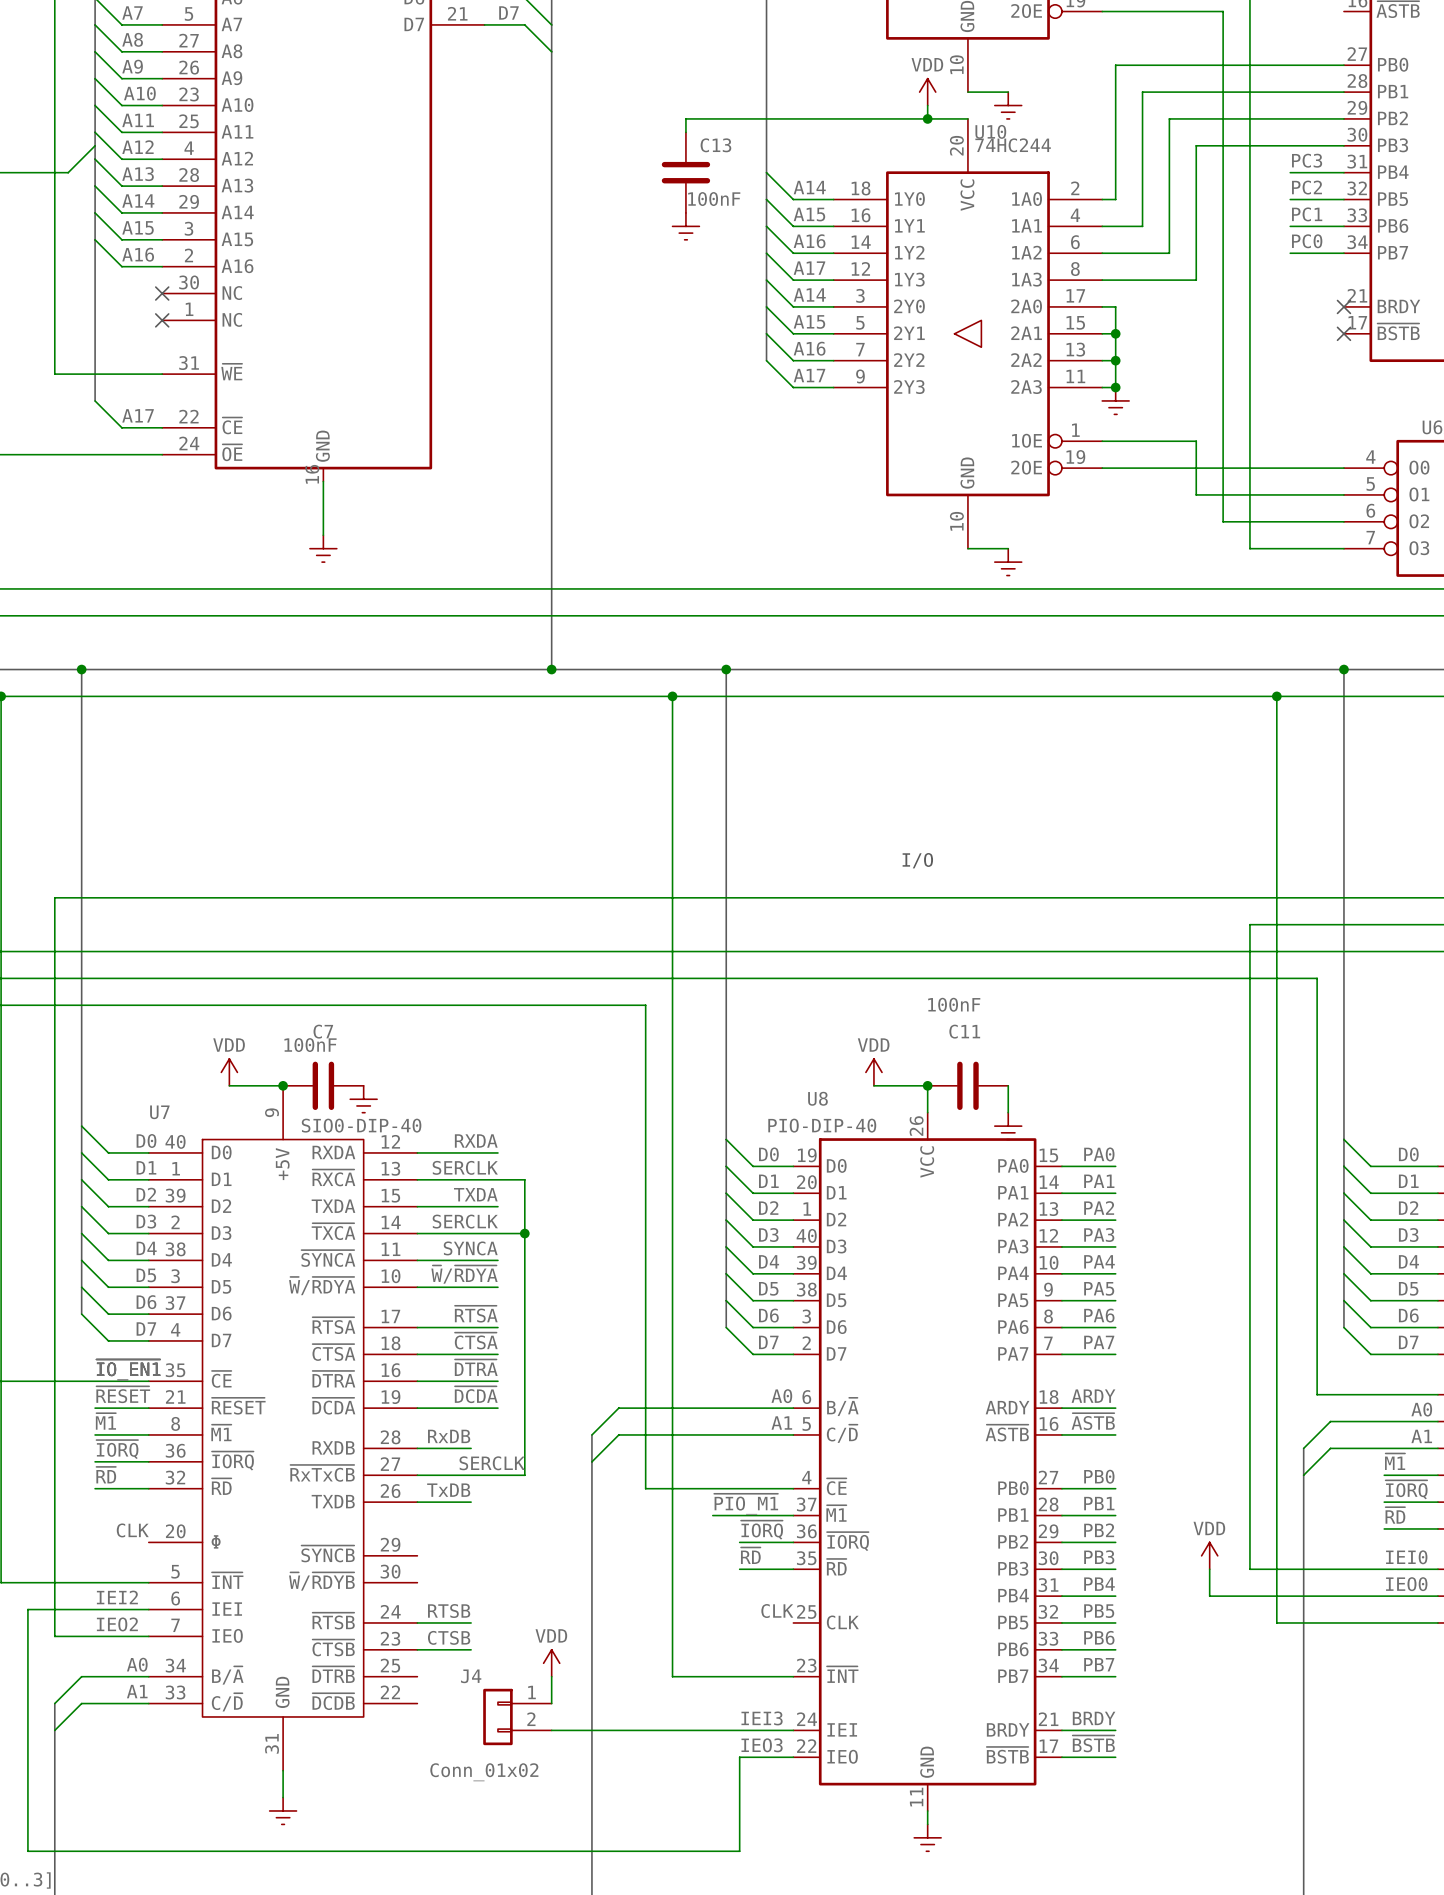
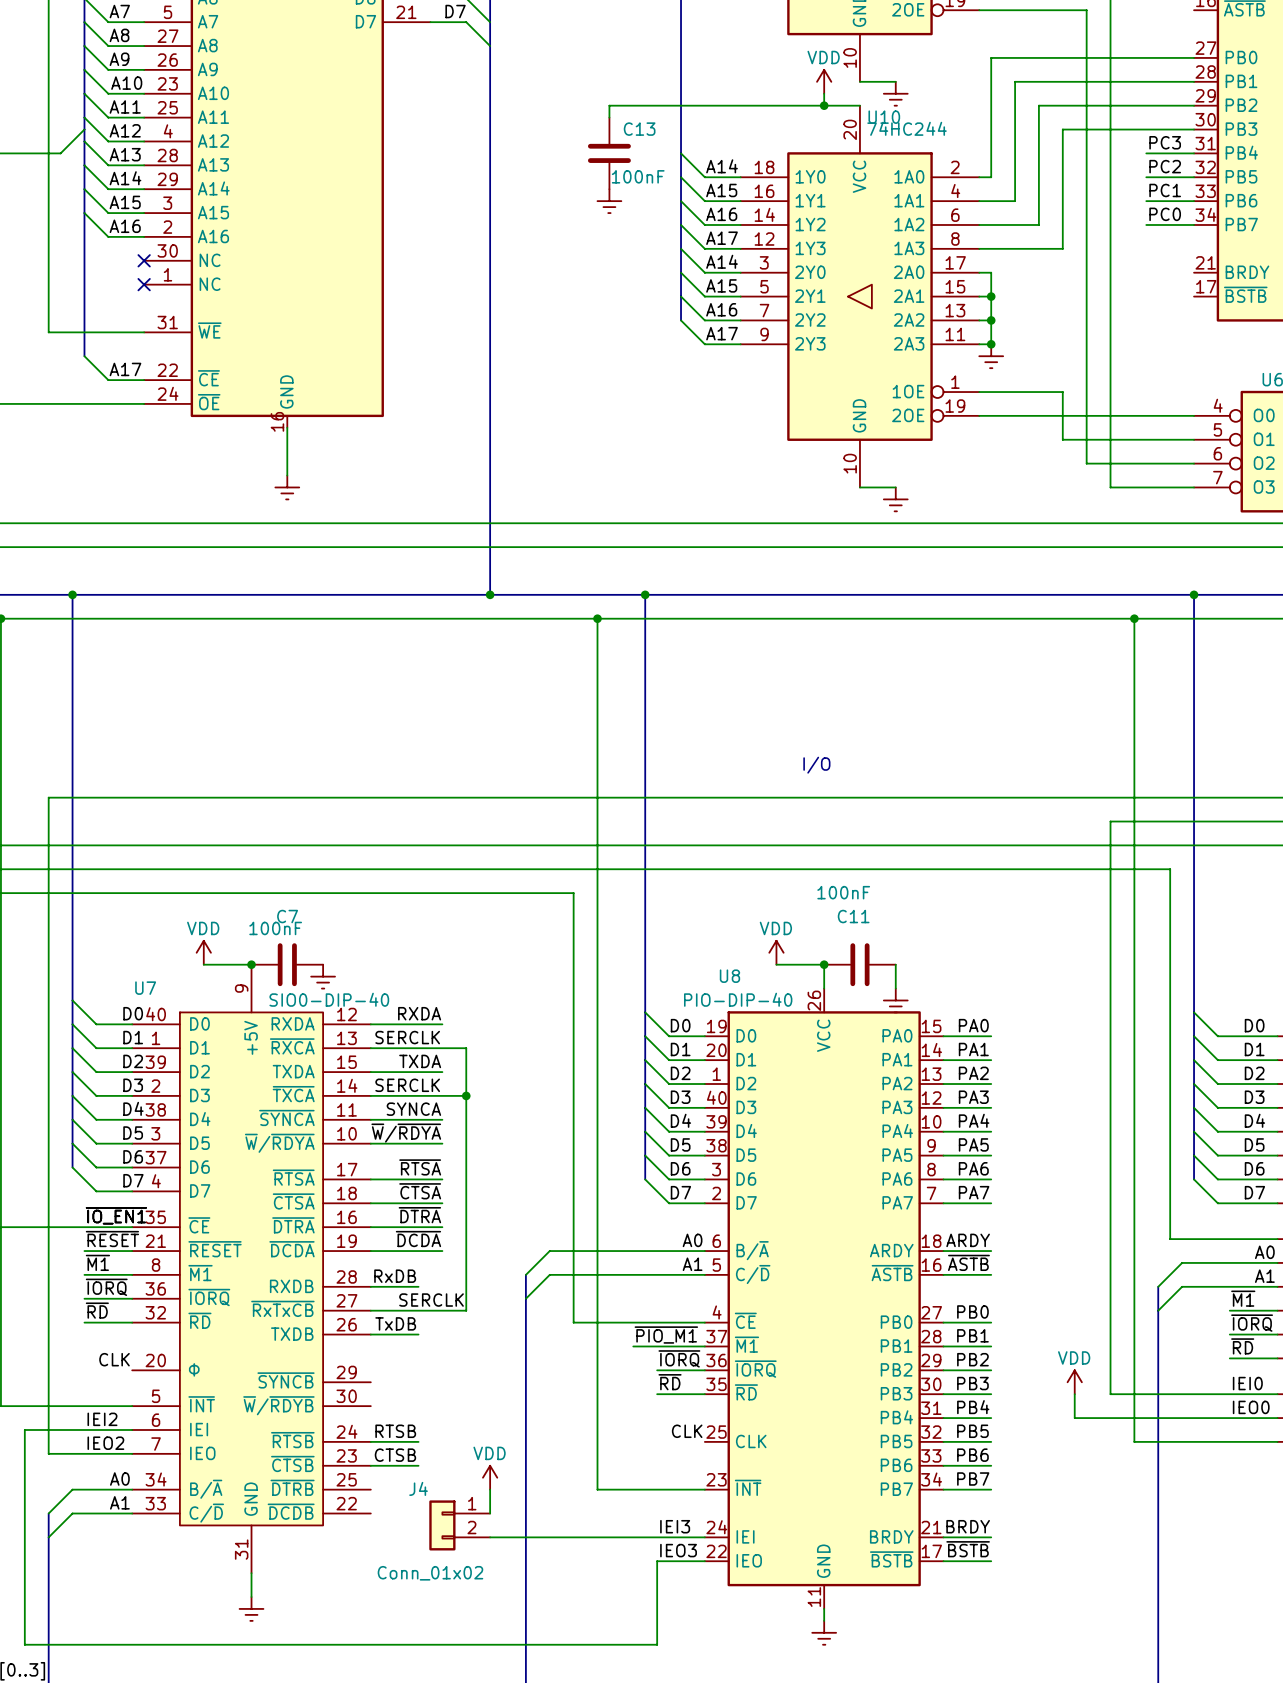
no-connect mark: (1343, 306) -> none
no-connect mark: (1343, 333) -> none

